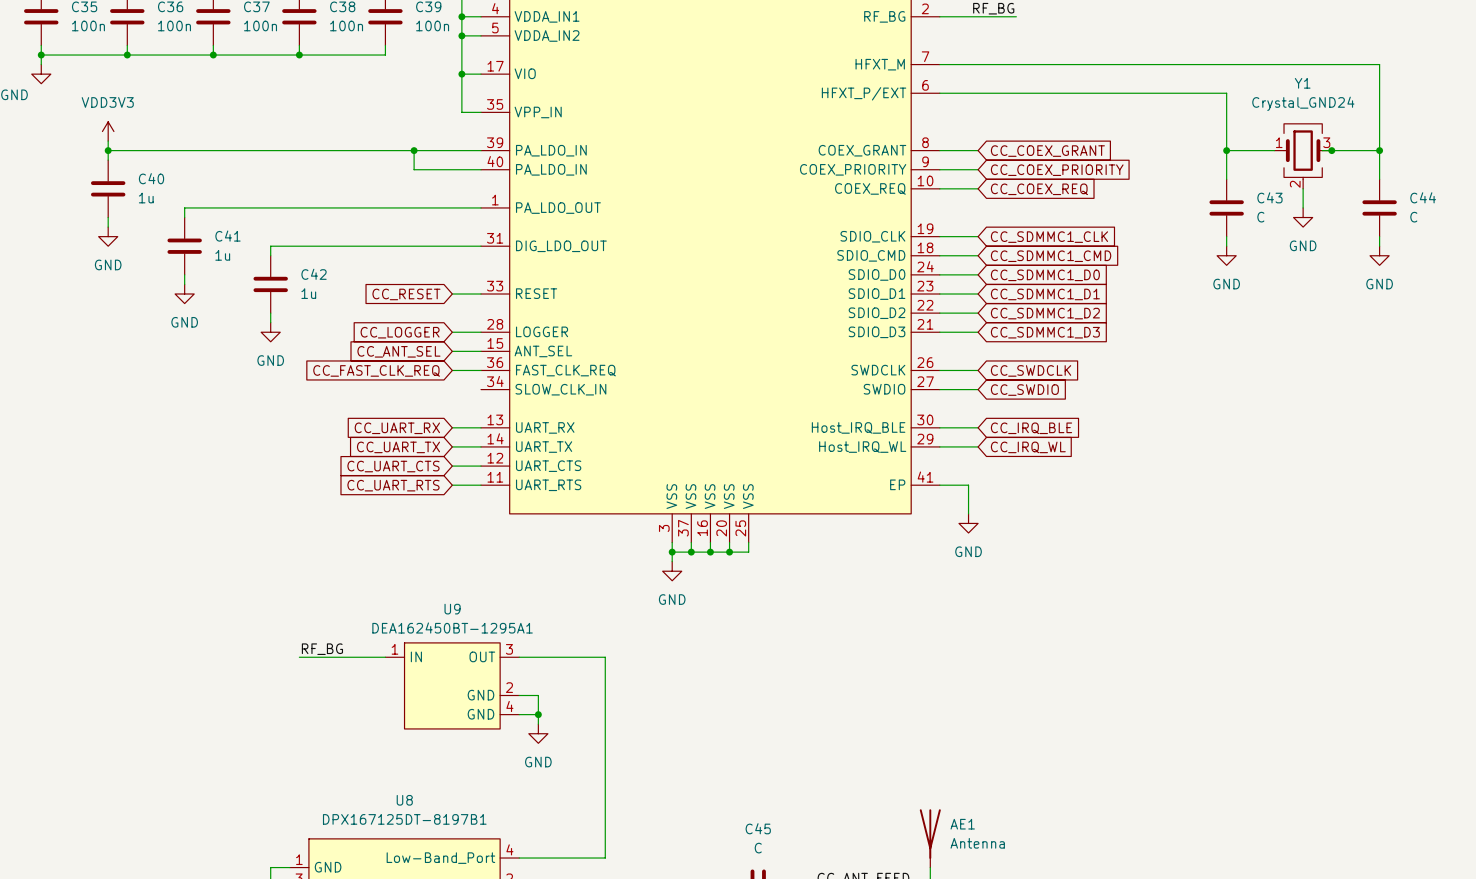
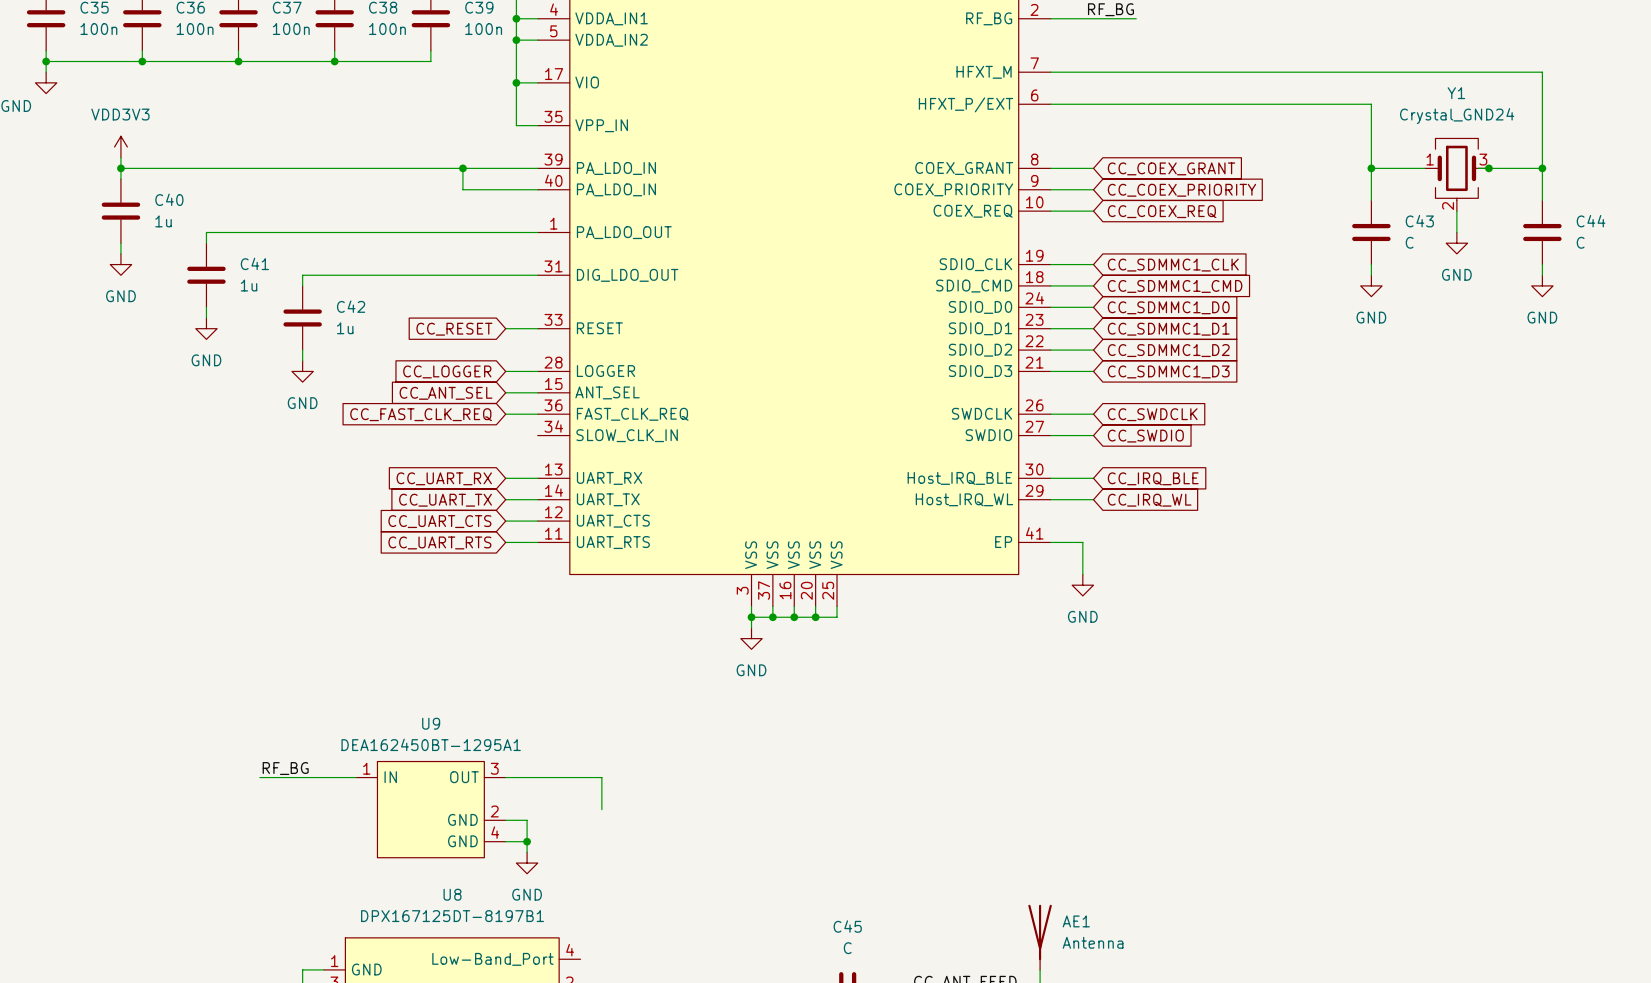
label position: RF_BG (322, 649) -> RF_BG (285, 768)
wire: (299, 657) (385, 657) -> (259, 777) (356, 777)
wire: (519, 657) (605, 657) (605, 858) (519, 858) -> none
U9 position: (452, 685) -> (430, 809)
wire: (519, 714) (538, 714) -> (505, 841) (527, 841)
junction: (538, 714) -> none
wire: none -> (505, 820) (527, 820) (527, 852)
power symbol position: GND (538, 733) -> GND (527, 863)
junction: none -> (527, 841)

